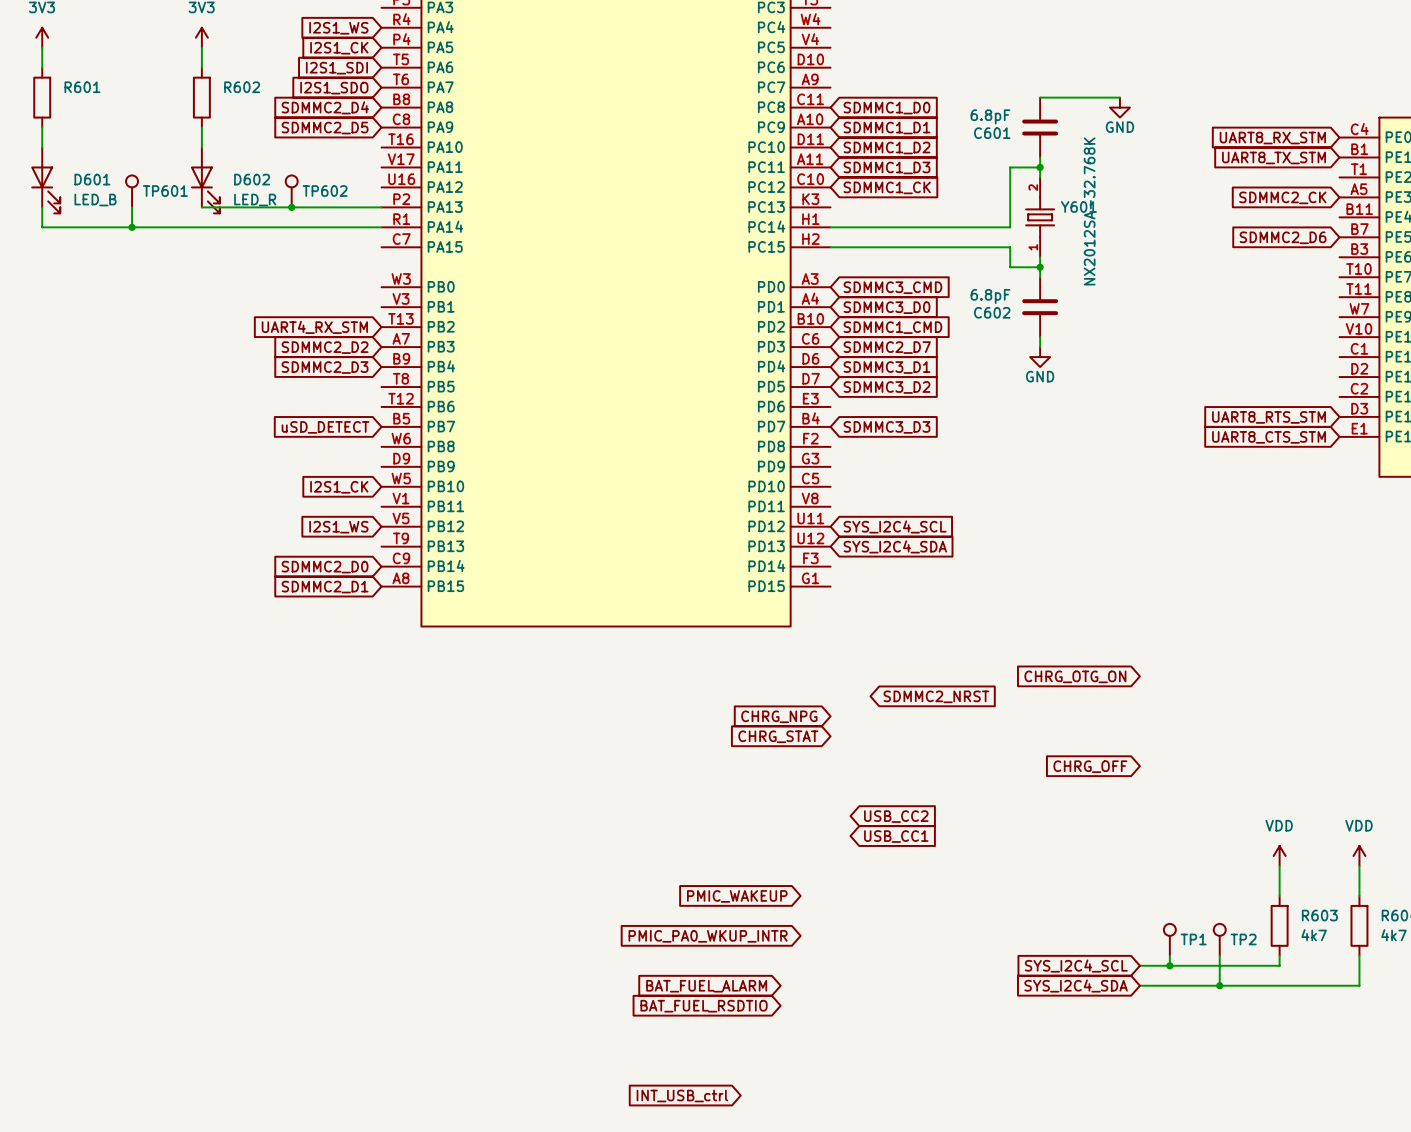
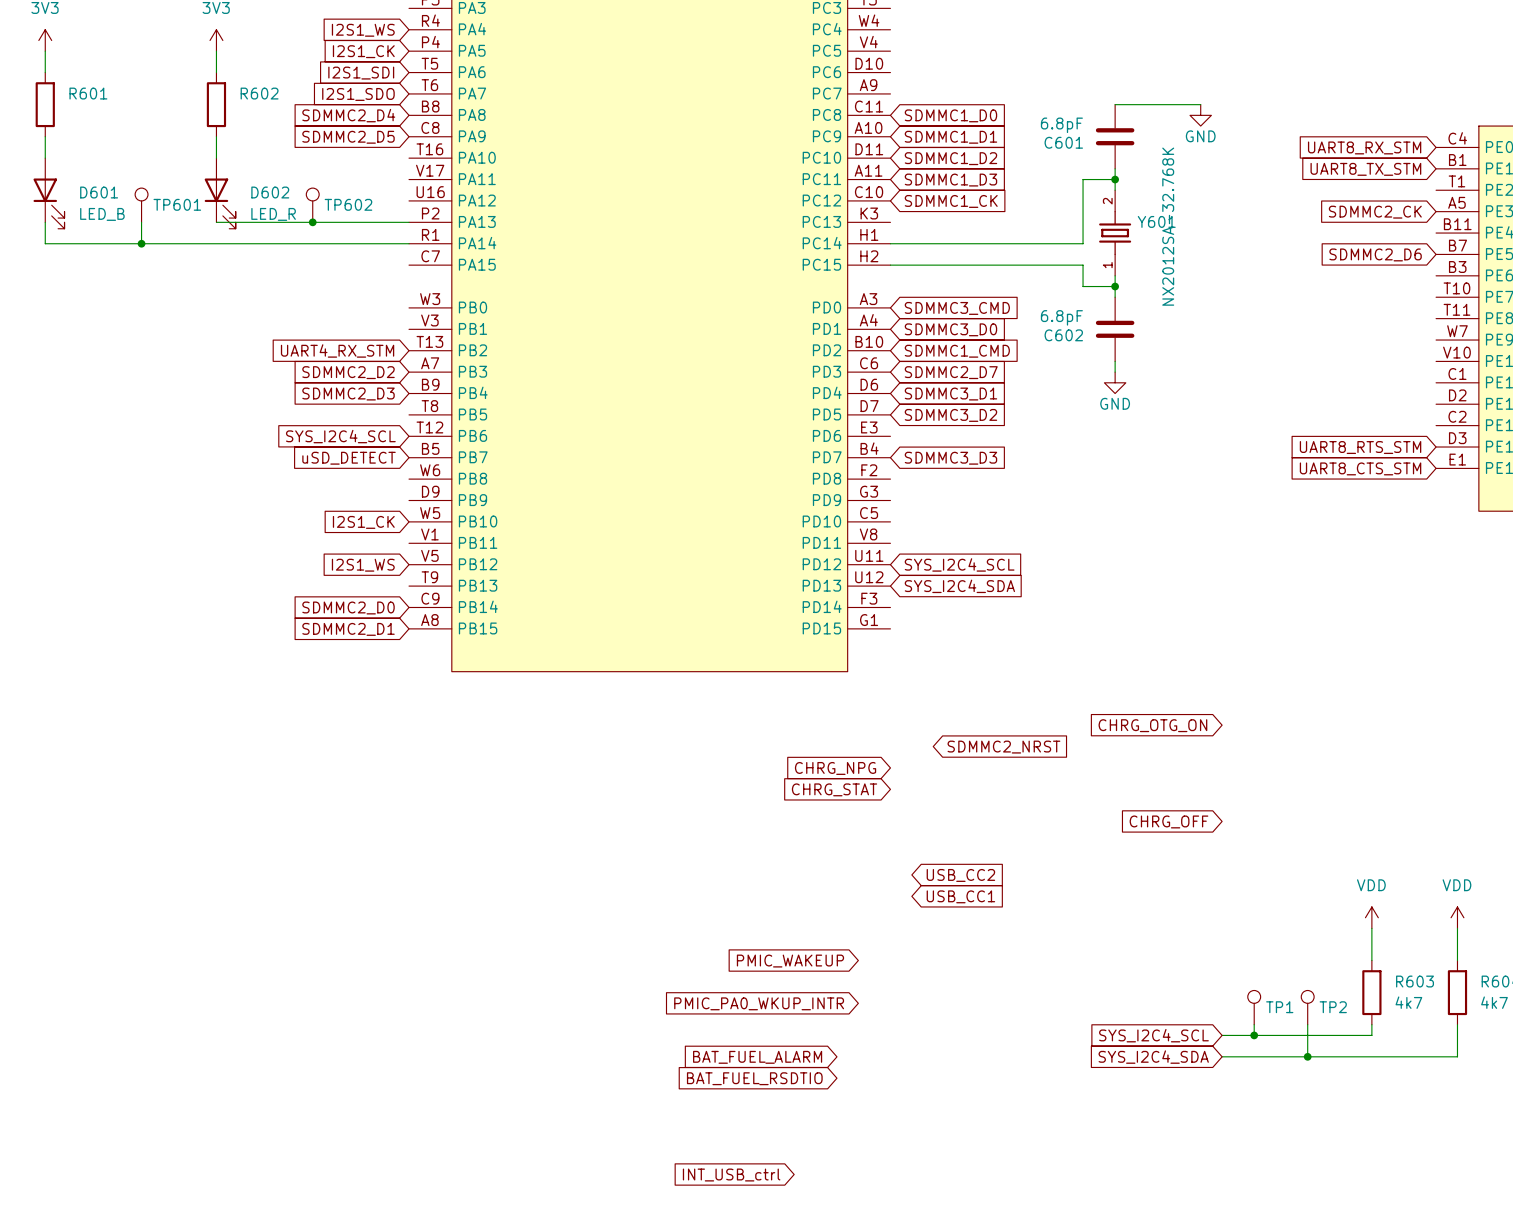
global label: none -> SYS_I2C4_SCL (340, 436)

